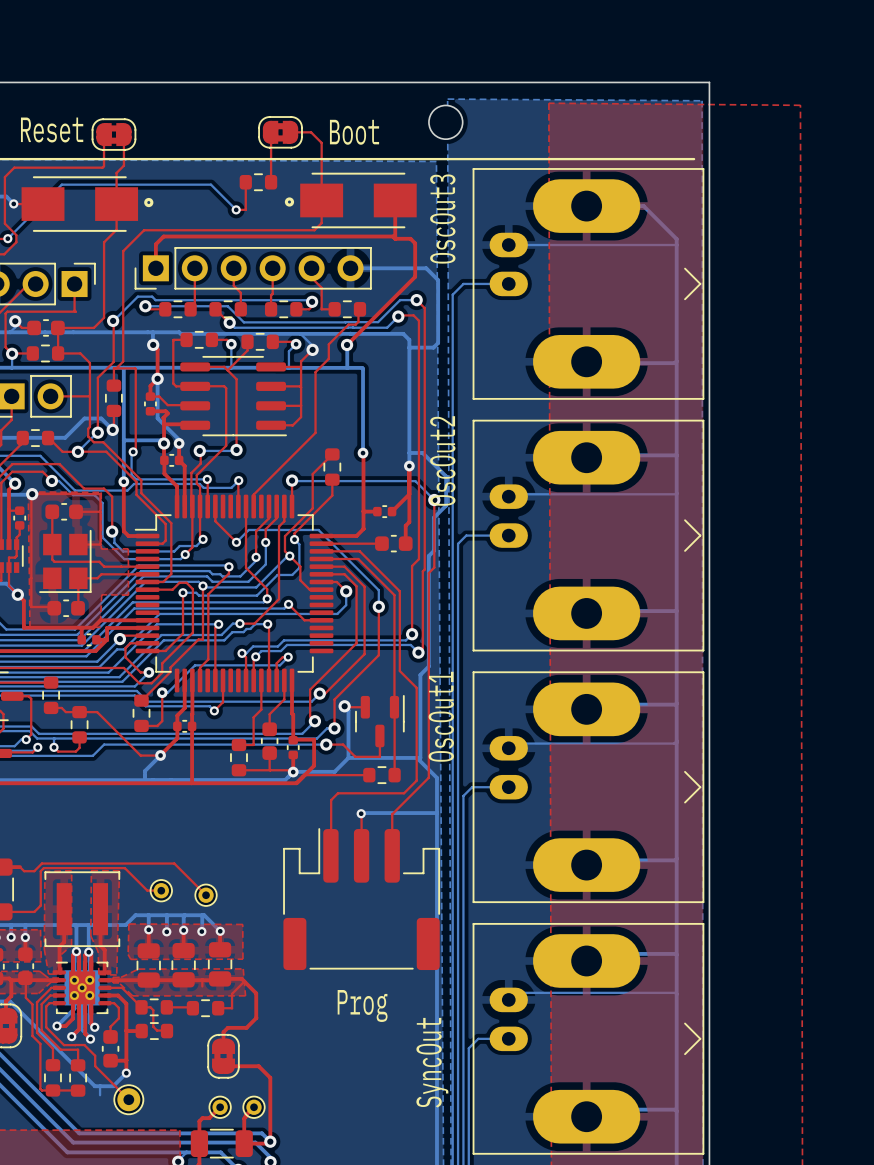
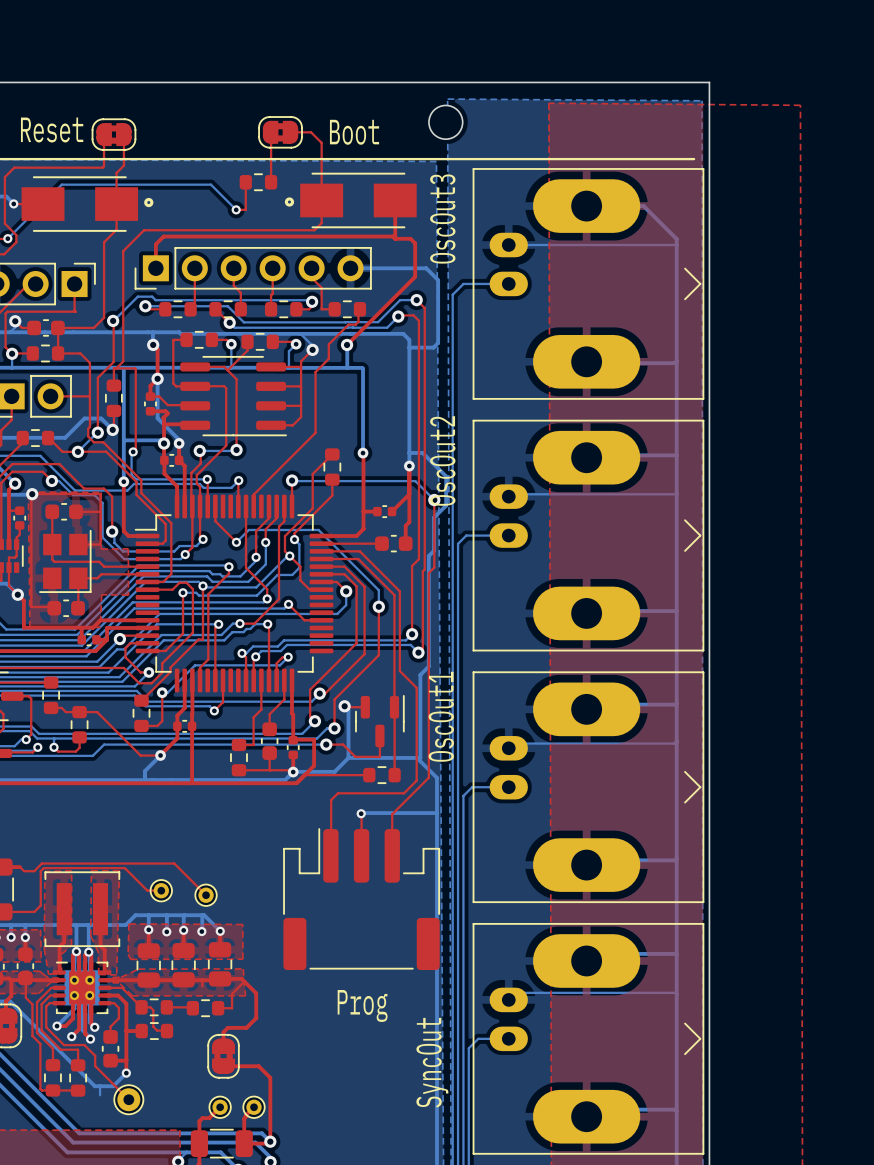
part footprint: [53, 960, 112, 1016] -> [53, 960, 112, 1016]

